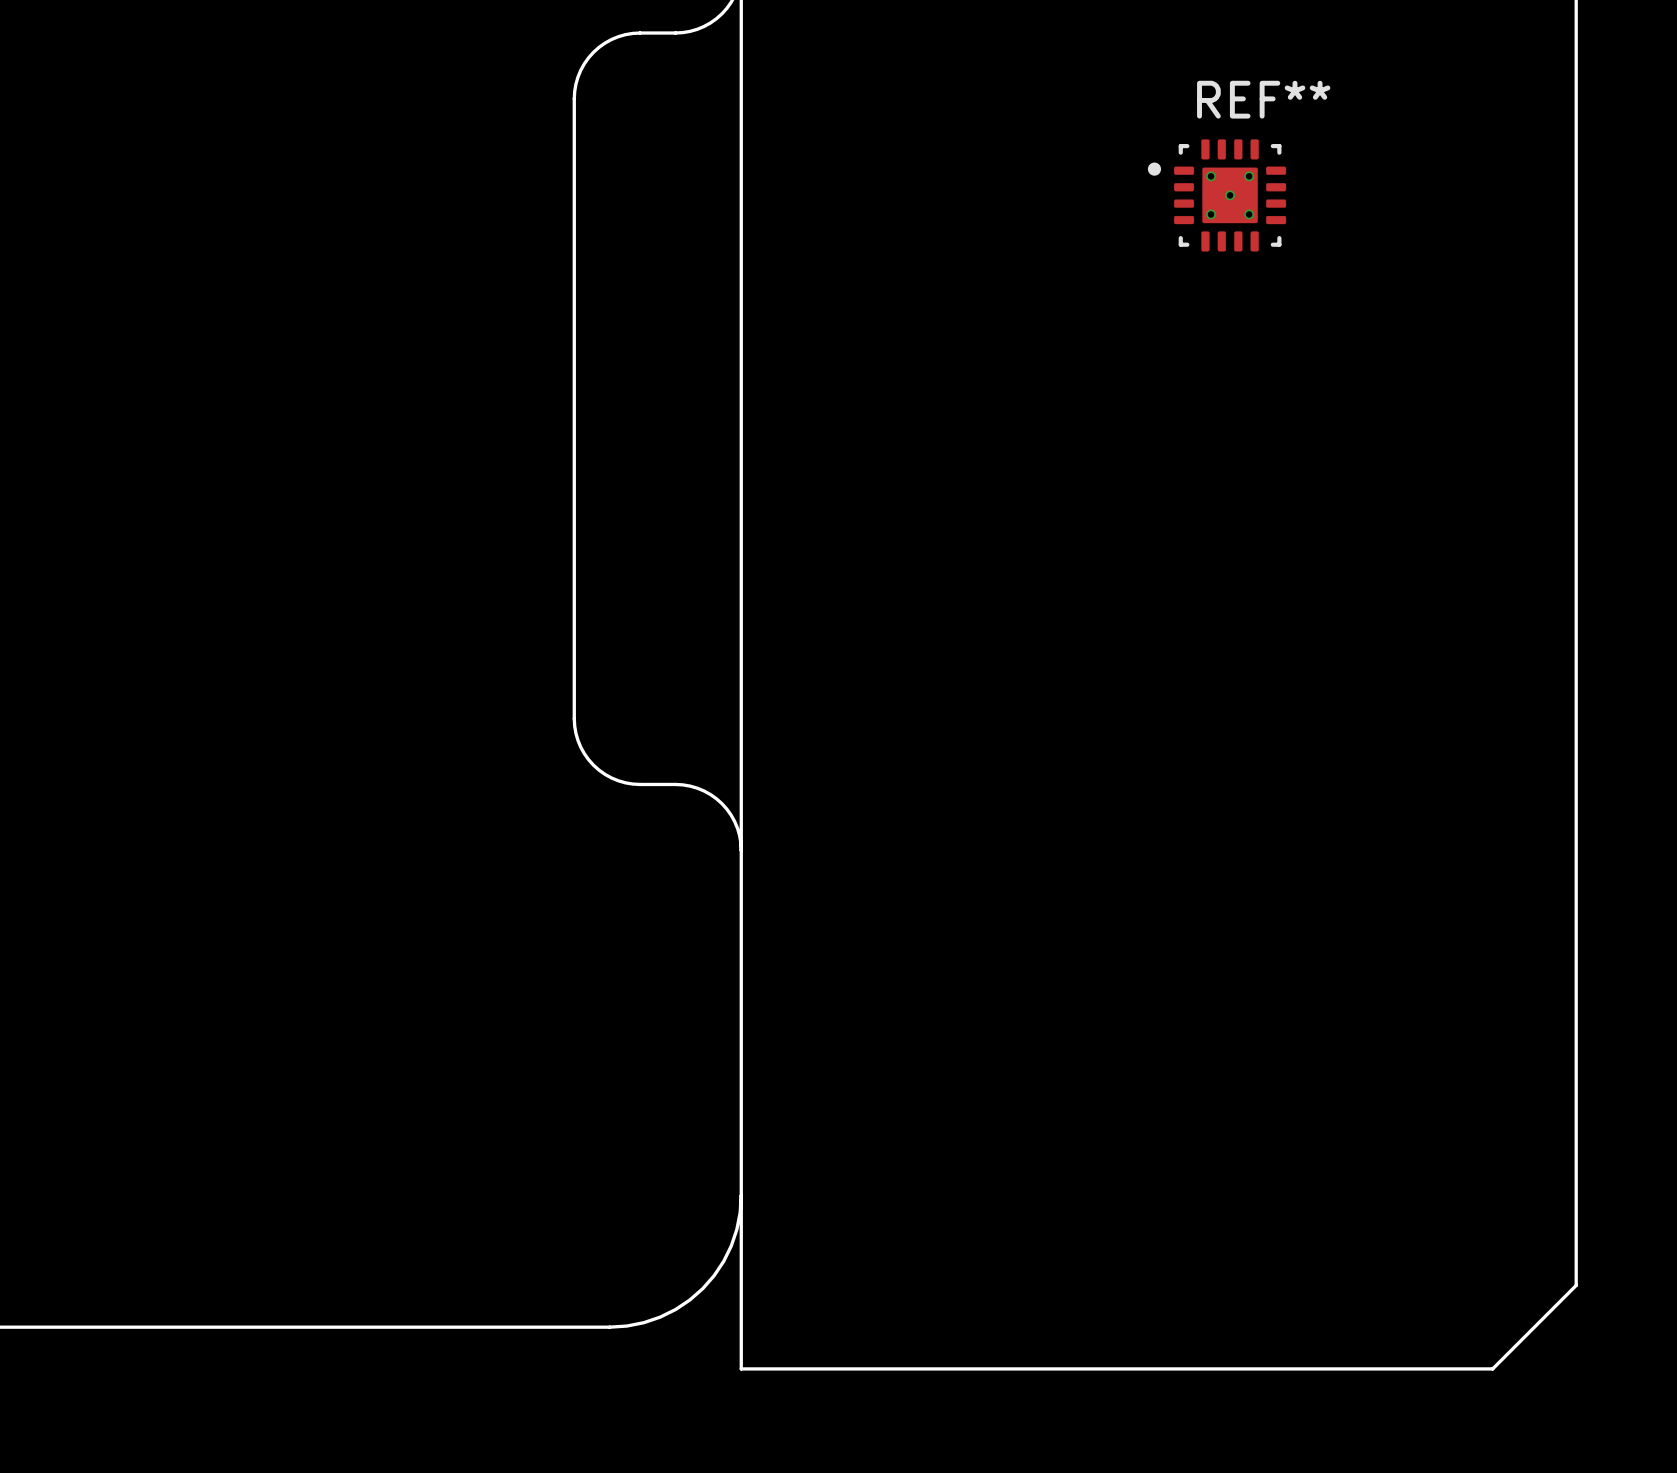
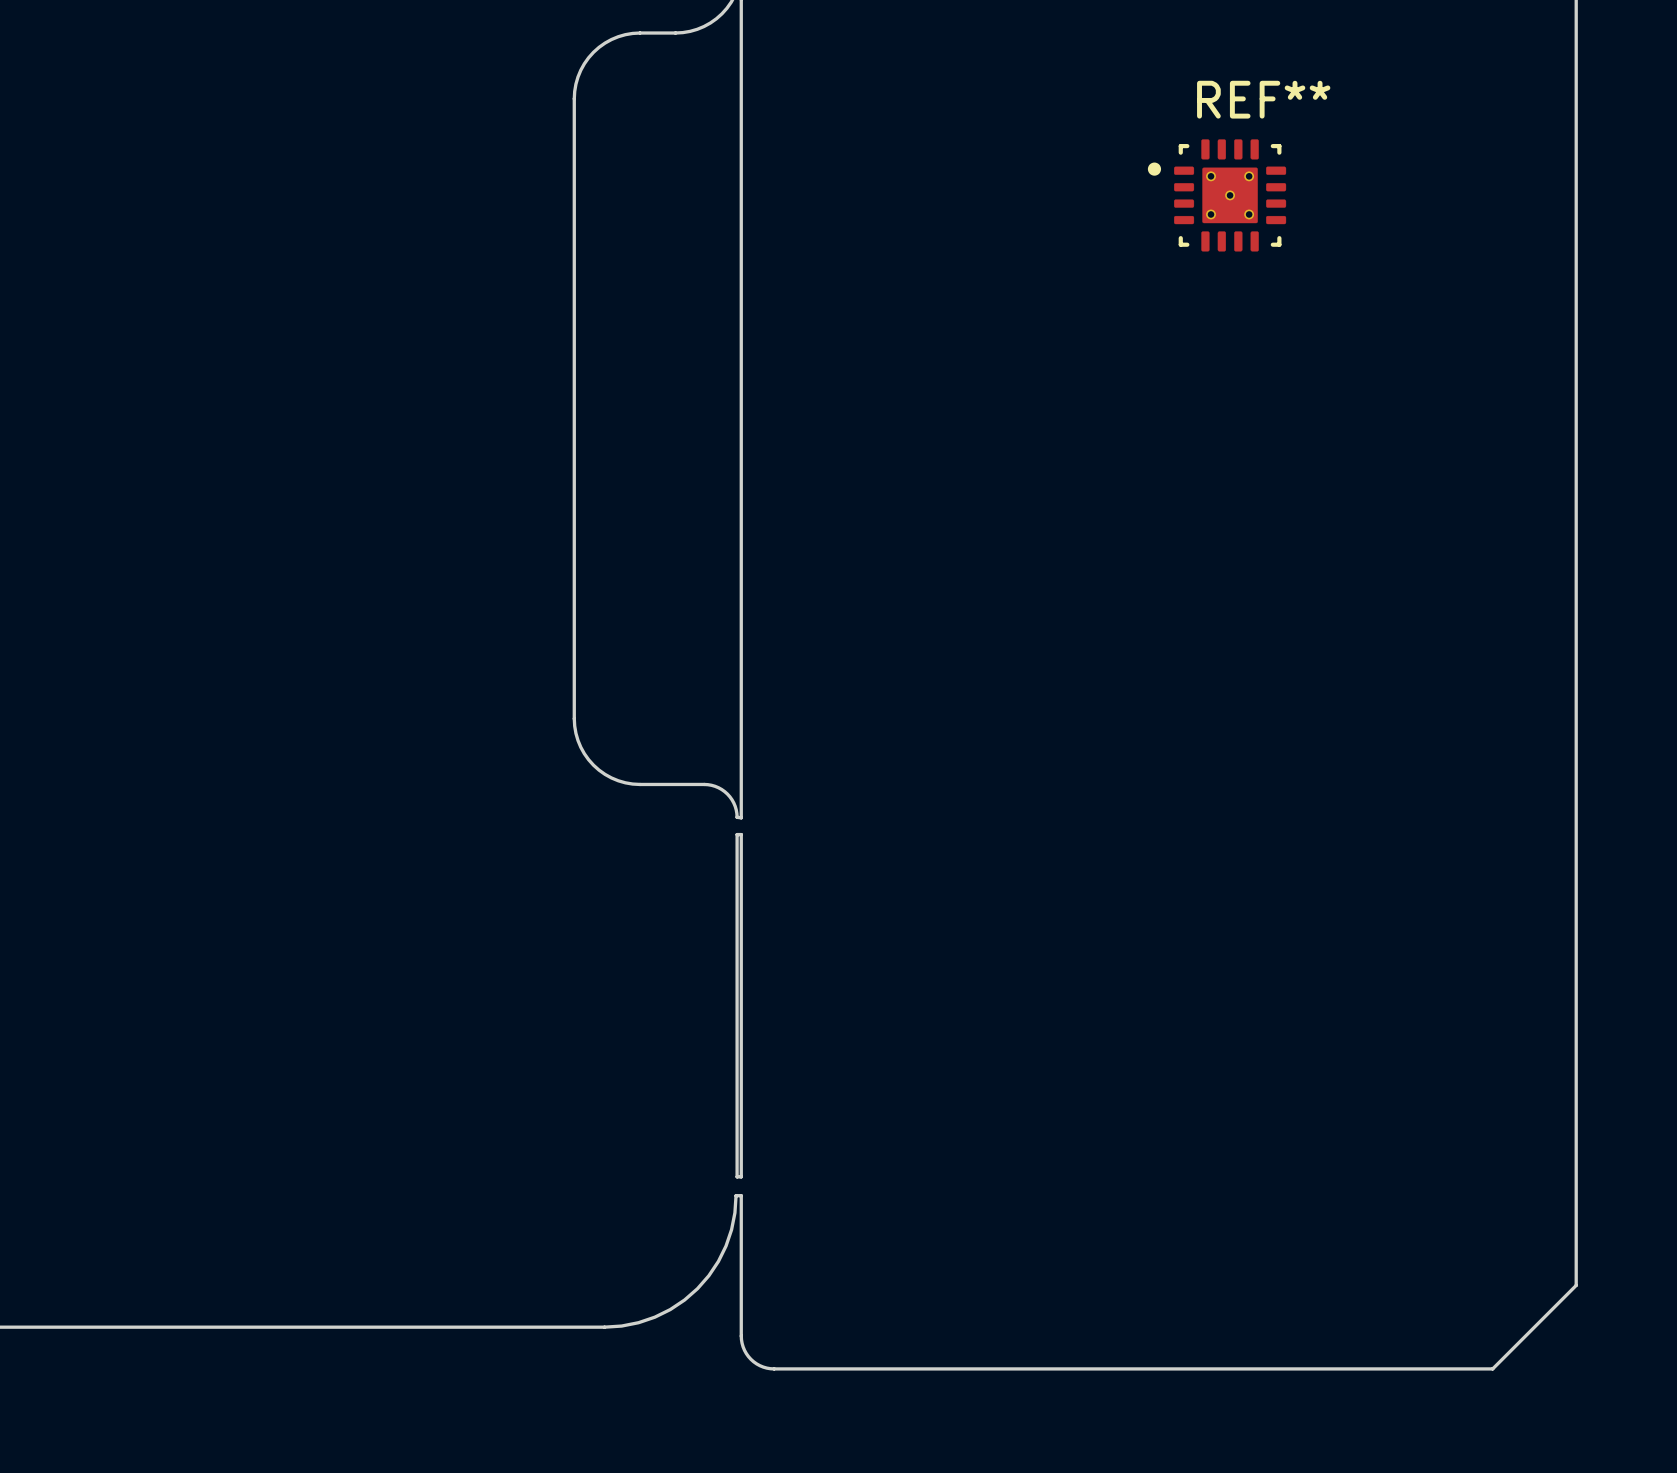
board edge: (675, 784) (697, 788) (710, 794) (722, 803) (731, 815) (737, 828) (741, 850) -> (675, 784) (707, 784) (718, 787) (729, 796) (735, 806) (737, 817) (741, 817)
board edge: (741, 817) (741, 834) -> (741, 1176) (737, 1176) (737, 834) (741, 834)
board edge: (741, 1176) (740, 1212) (731, 1246) (714, 1275) (702, 1288) (689, 1300) (660, 1317) (626, 1326) (604, 1327) -> (741, 1195) (736, 1195) (731, 1229) (726, 1246) (718, 1261) (697, 1288) (670, 1309) (654, 1317) (621, 1326) (604, 1327)
board edge: (741, 1336) (741, 1368) (774, 1368) -> (741, 1336) (744, 1350) (750, 1359) (763, 1367) (774, 1368)

